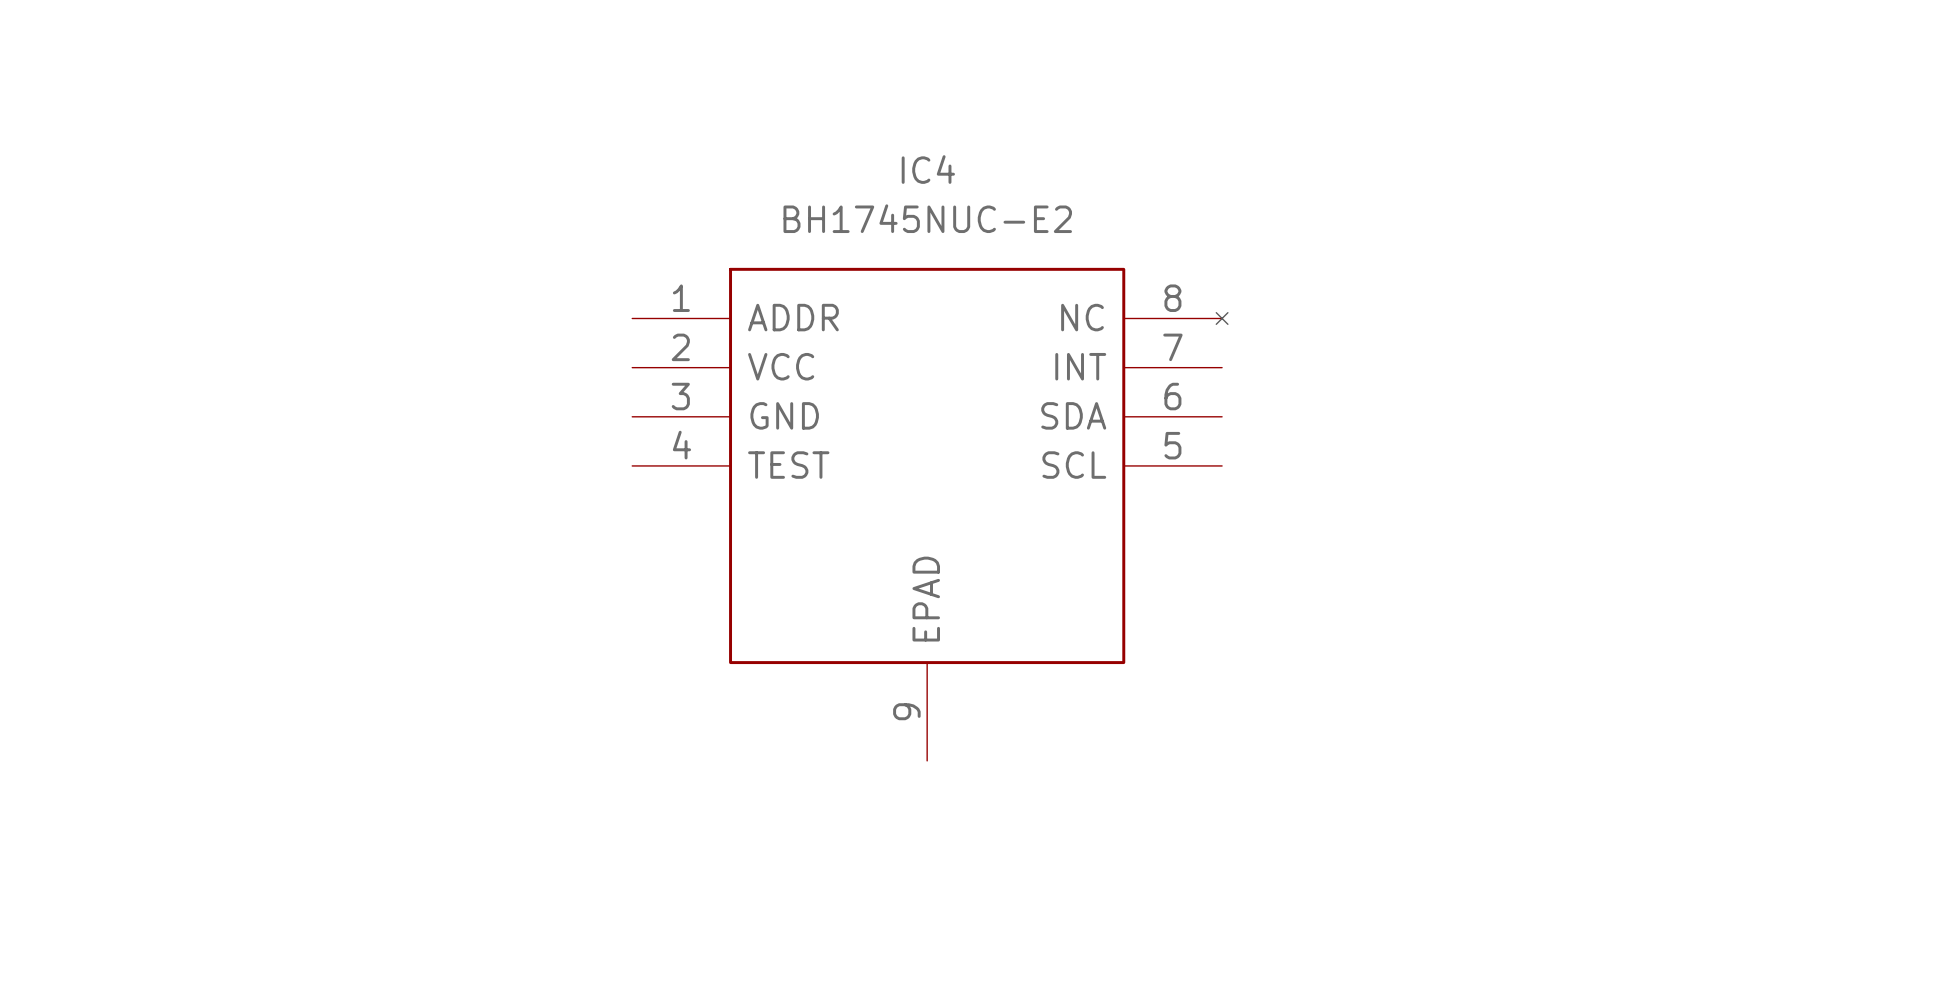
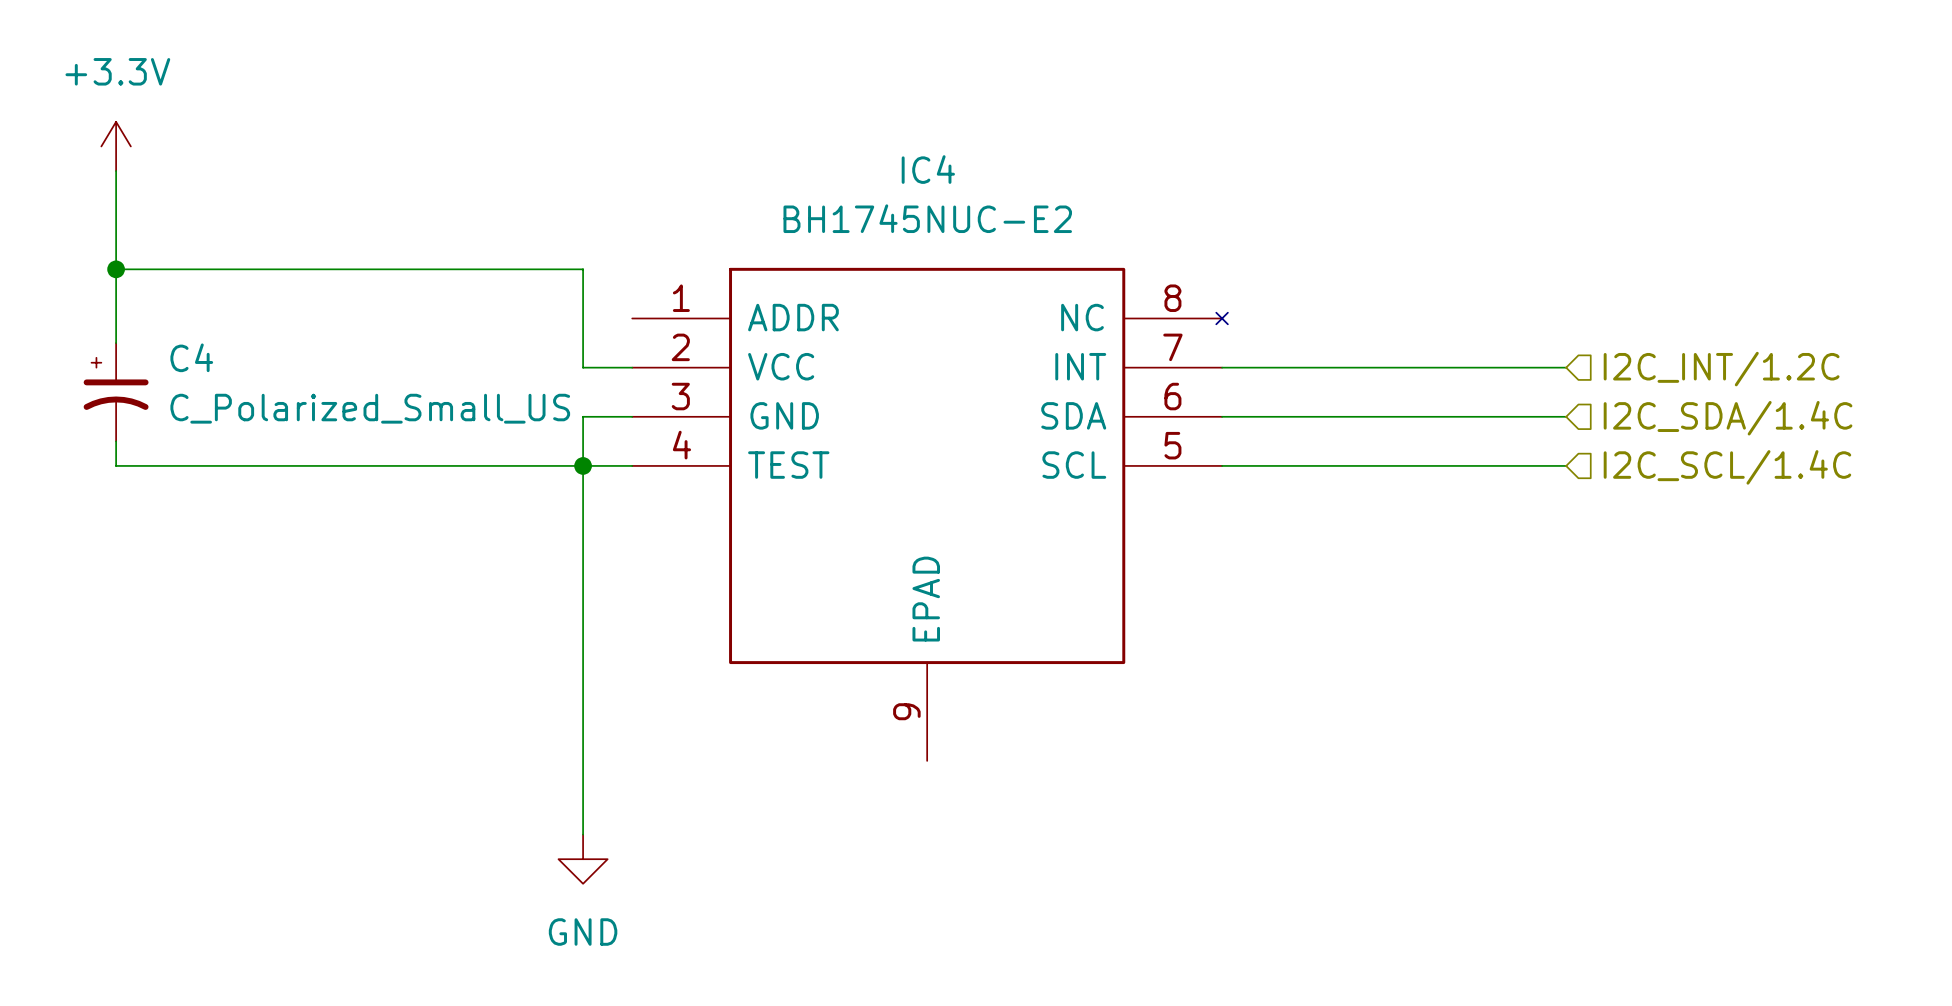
power symbol: none -> +3.3V (116, 146)
wire: none -> (116, 171) (116, 343)
wire: none -> (116, 269) (583, 269) (583, 367) (632, 367)
junction: none -> (116, 269)
wire: none -> (1222, 367) (1566, 367)
hierarchical label: none -> I2C_INT/1.2C (1721, 369)
C4: none -> C_Polarized_Small_US (116, 392)
wire: none -> (632, 416) (583, 416) (583, 834)
wire: none -> (1222, 416) (1566, 416)
hierarchical label: none -> I2C_SDA/1.4C (1728, 418)
wire: none -> (116, 441) (116, 465) (632, 465)
junction: none -> (583, 465)
wire: none -> (1222, 465) (1566, 465)
hierarchical label: none -> I2C_SCL/1.4C (1727, 467)
power symbol: none -> GND (583, 859)

